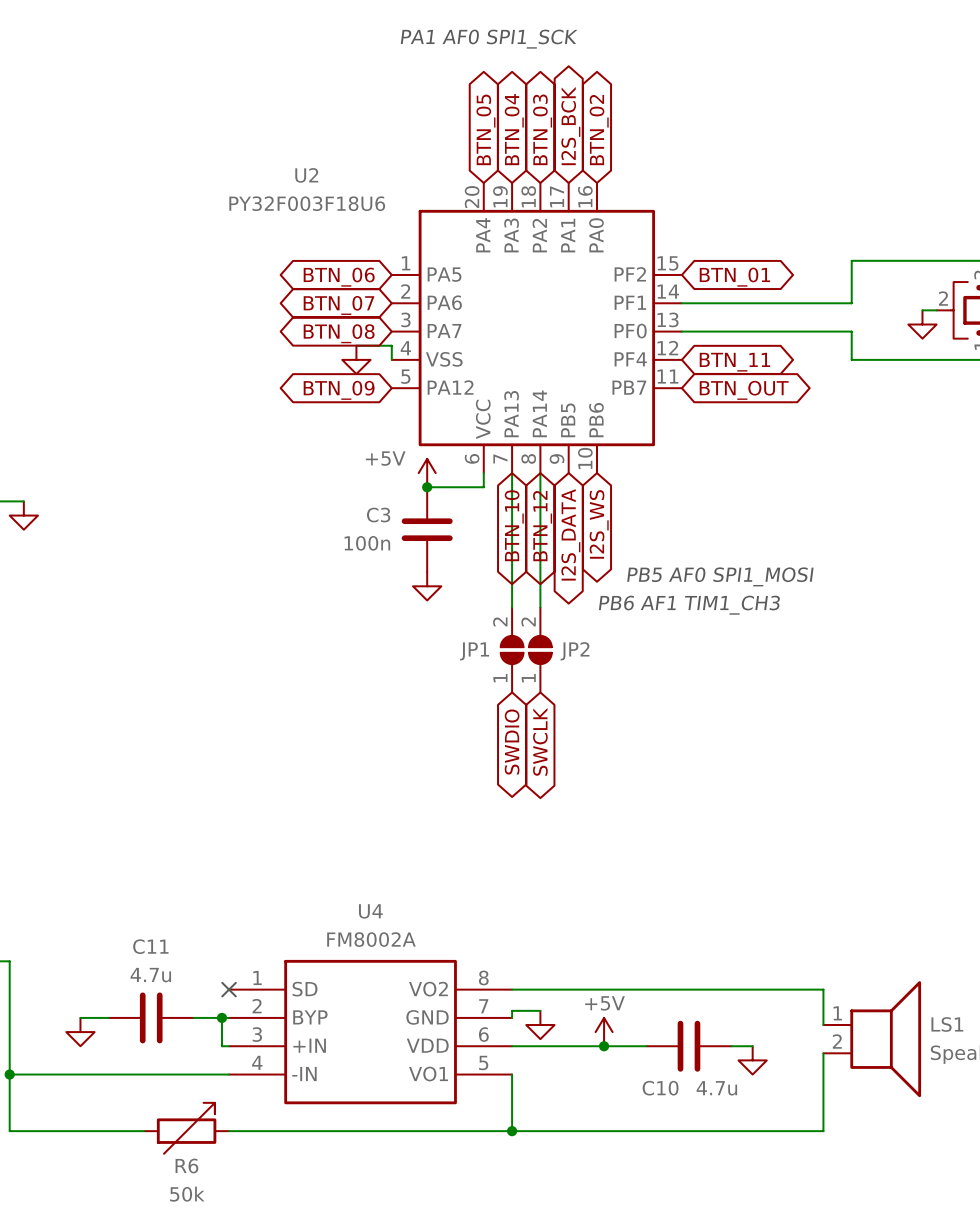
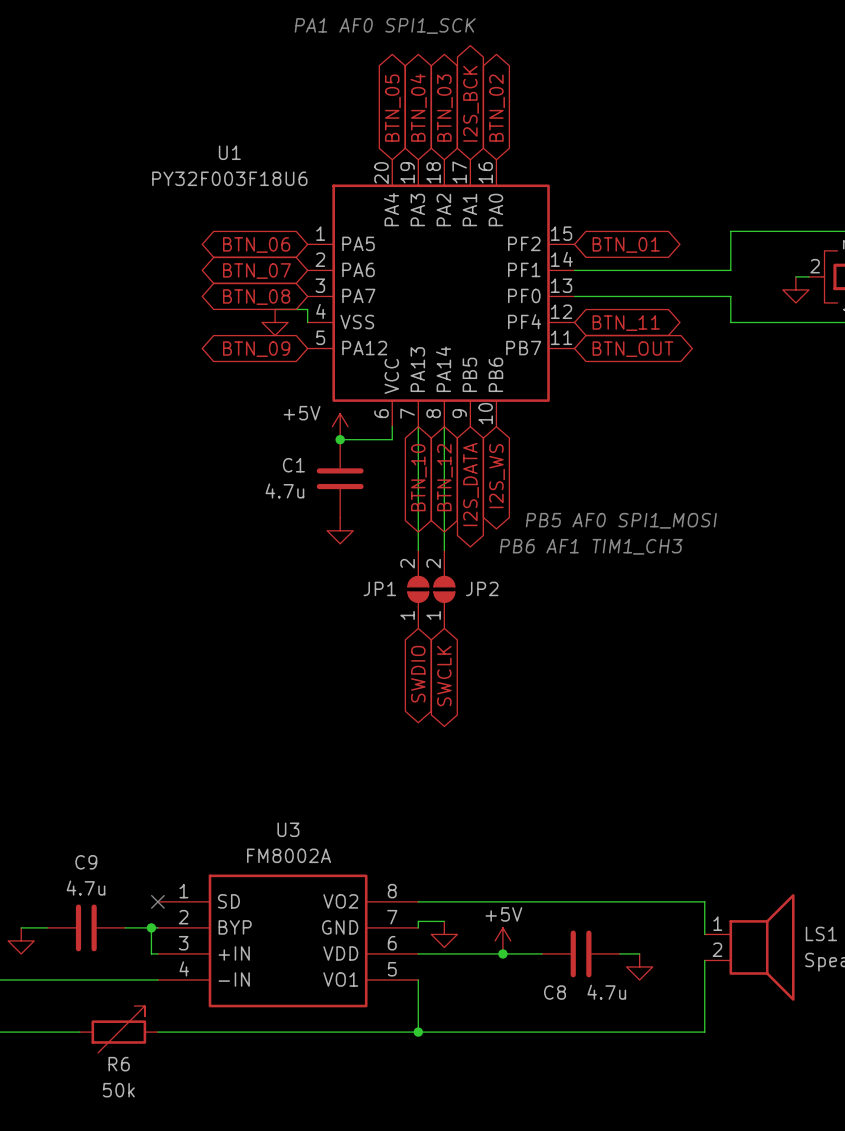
U2 name: U2 (306, 175) -> U1 (229, 152)
C3 name: C3 (378, 515) -> C1 (293, 465)
C3 value: 100n (367, 543) -> 4.7u (284, 490)
U4 name: U4 (370, 911) -> U3 (288, 829)
C11 name: C11 (150, 946) -> C9 (86, 862)
C10 name: C10 (660, 1088) -> C8 (555, 992)

